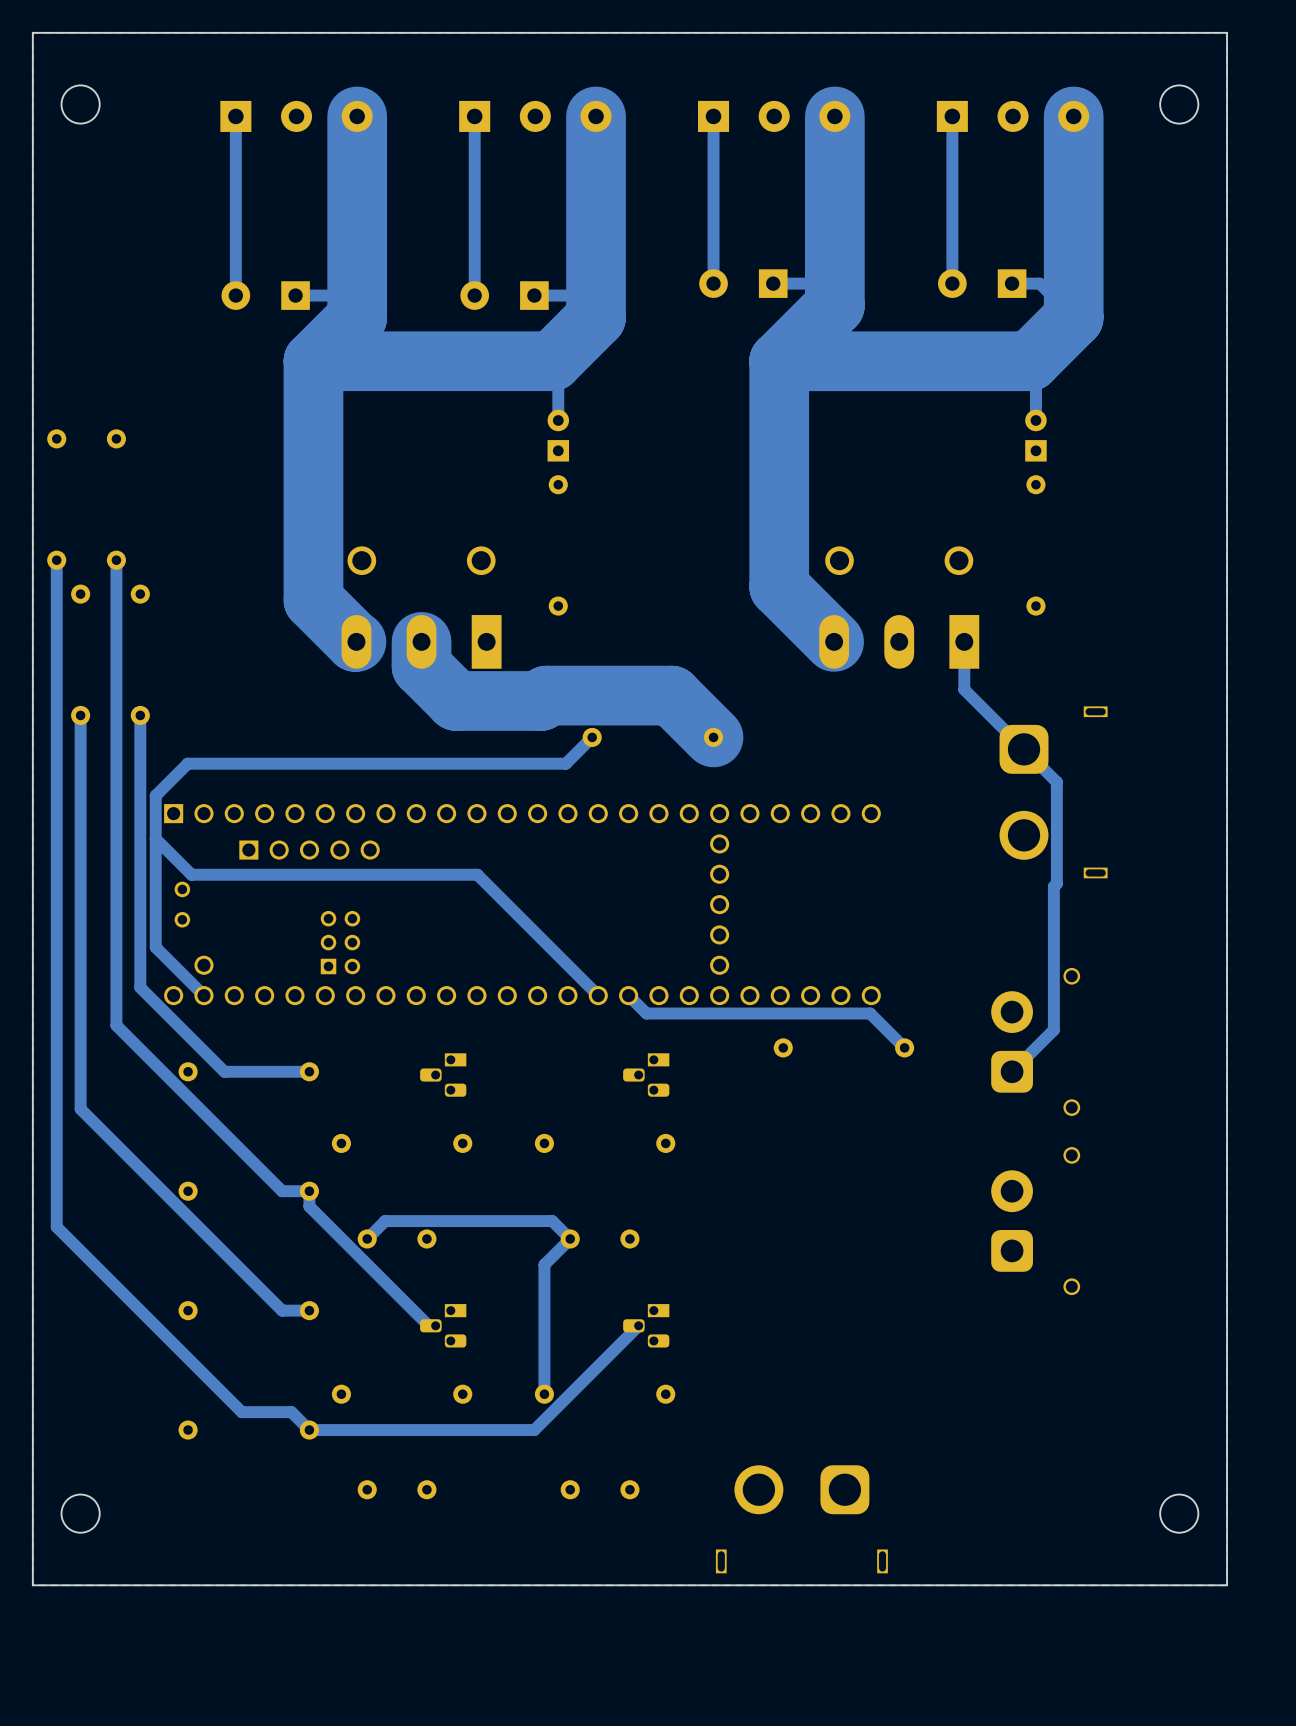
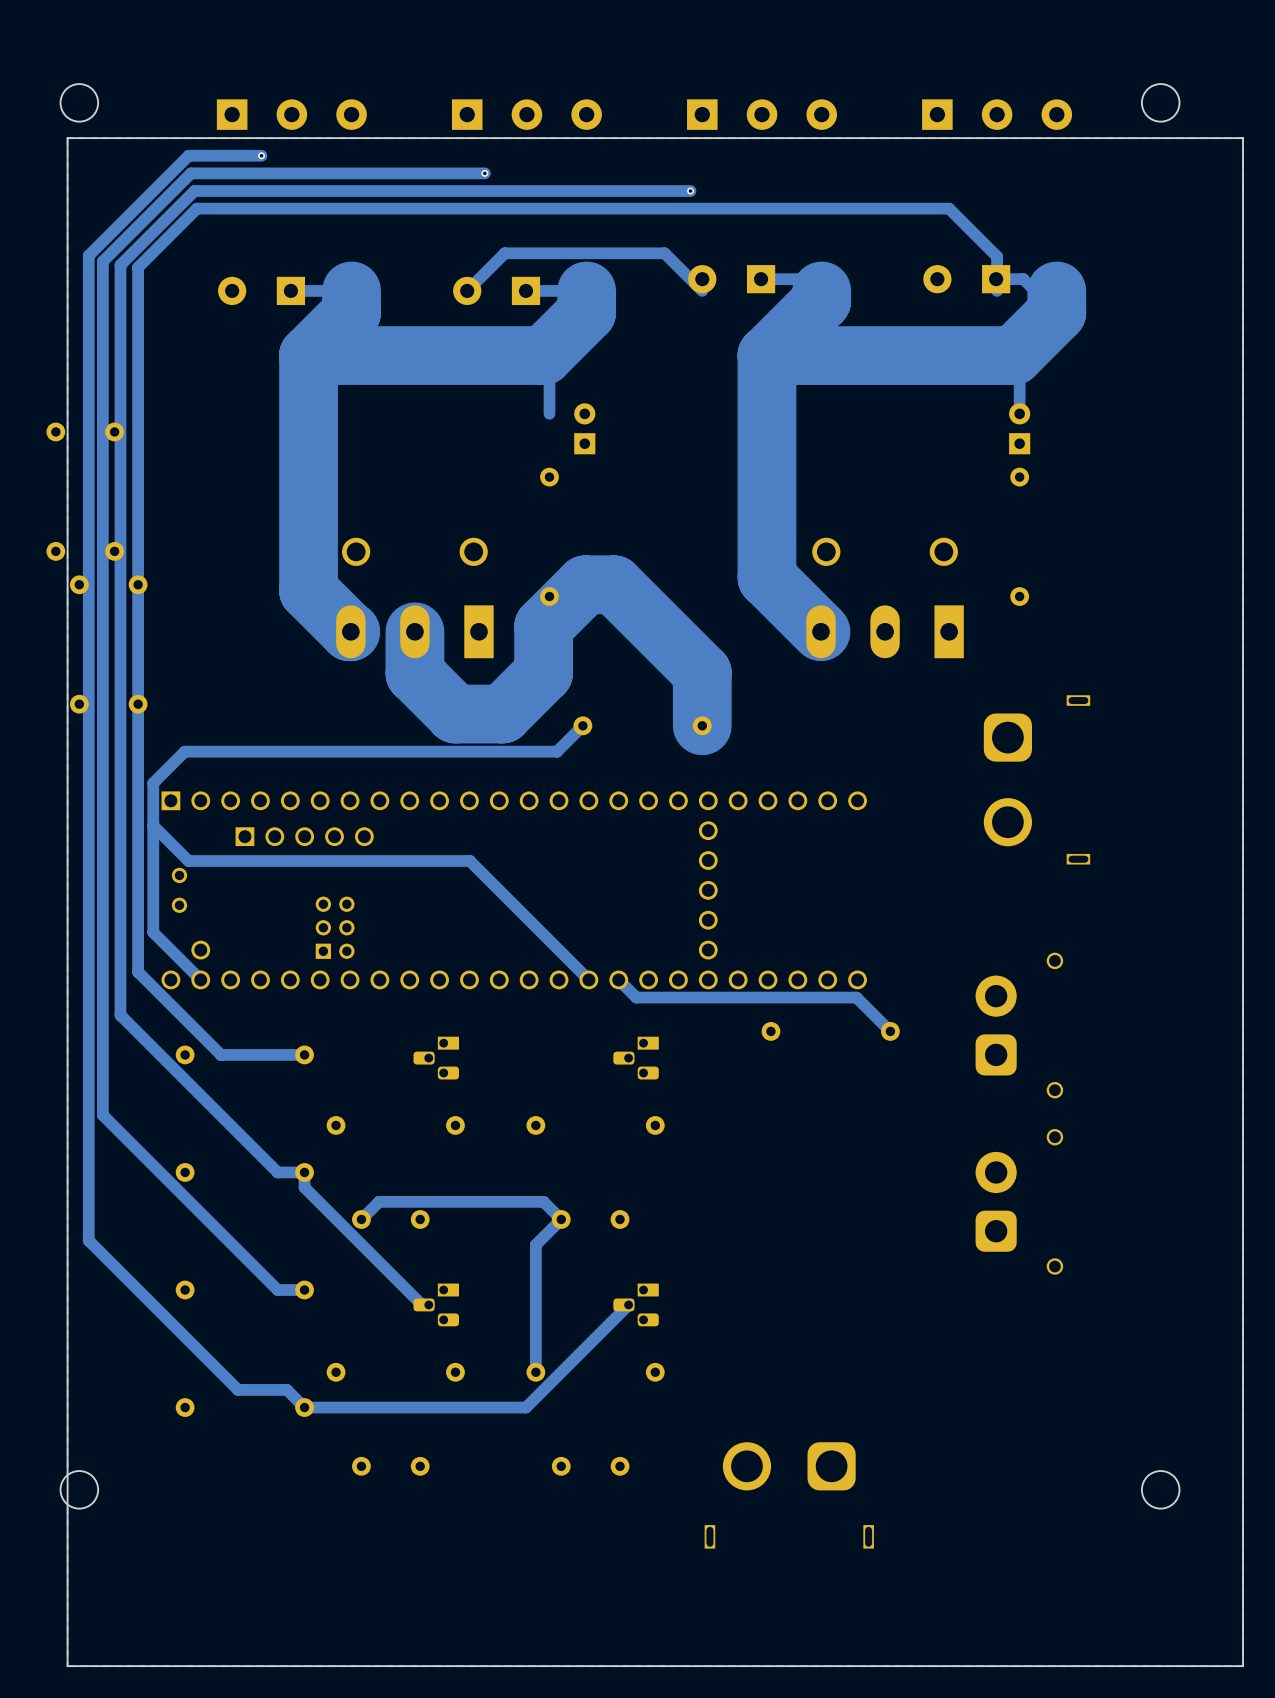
board edge: (1227, 32) (32, 32) (32, 1585) (1227, 1585) (1227, 32) -> (1242, 138) (67, 138) (67, 1666) (1242, 1666) (1242, 138)
track: (235, 116) (235, 295) -> none
track: (357, 116) (357, 295) -> none
track: (474, 116) (474, 295) -> (702, 290) (664, 253) (504, 253) (467, 290)
track: (596, 116) (596, 295) -> none
track: (713, 116) (713, 283) -> none
track: (834, 116) (834, 295) -> none
track: (952, 116) (952, 283) -> none
track: (1073, 116) (1073, 295) -> none
via: none -> (261, 155)
via: none -> (484, 173)
via: none -> (690, 191)
track: none -> (997, 290) (997, 256) (949, 208) (196, 208) (138, 267) (138, 704)
part position: (558, 435) -> (584, 428)
track: (56, 560) (56, 1227) (90, 1260) -> (261, 155) (188, 155) (88, 255) (88, 1240)
track: (116, 560) (116, 1025) (122, 1031) -> (690, 191) (194, 191) (120, 265) (120, 1015)
track: (964, 641) (964, 689) (1056, 782) (1056, 883) (1053, 886) (1053, 1029) (1012, 1071) -> none
track: (421, 666) (456, 700) (540, 700) (546, 695) (671, 695) (713, 737) -> (414, 655) (414, 673) (455, 714) (502, 714) (543, 672) (543, 626) (585, 584) (614, 584) (702, 672) (702, 725)
track: (80, 715) (80, 1109) (104, 1132) -> (484, 173) (191, 173) (102, 261) (102, 1115)

